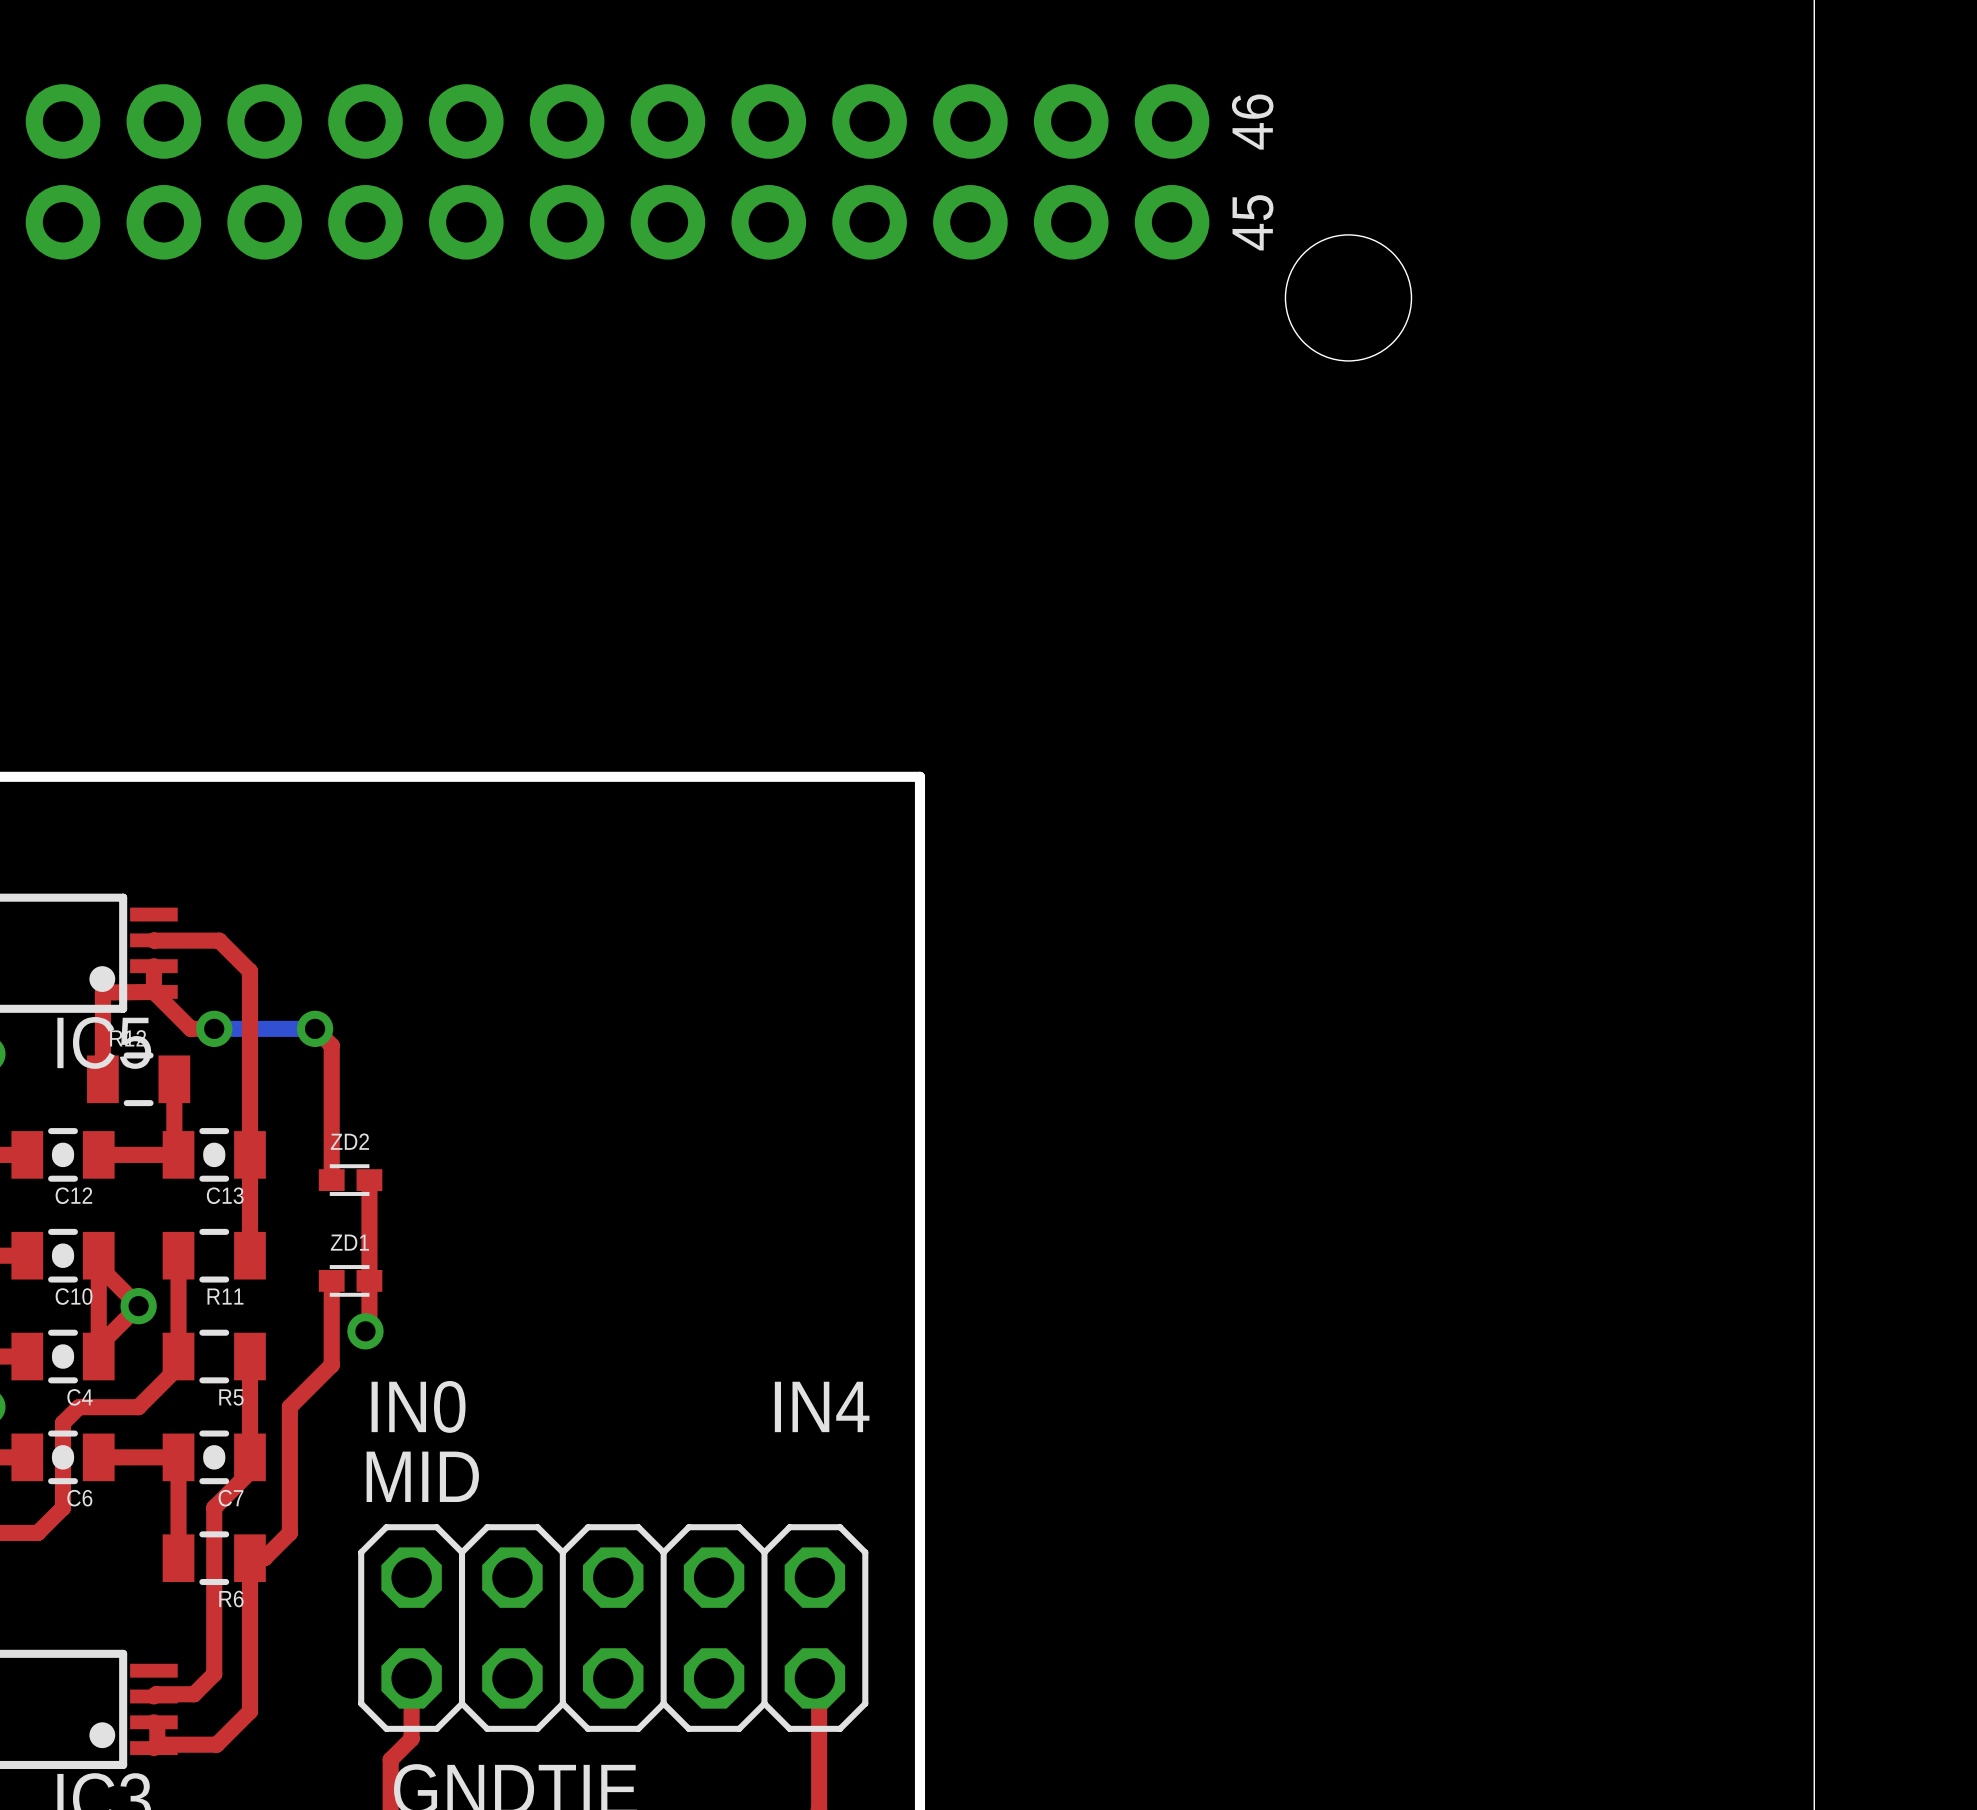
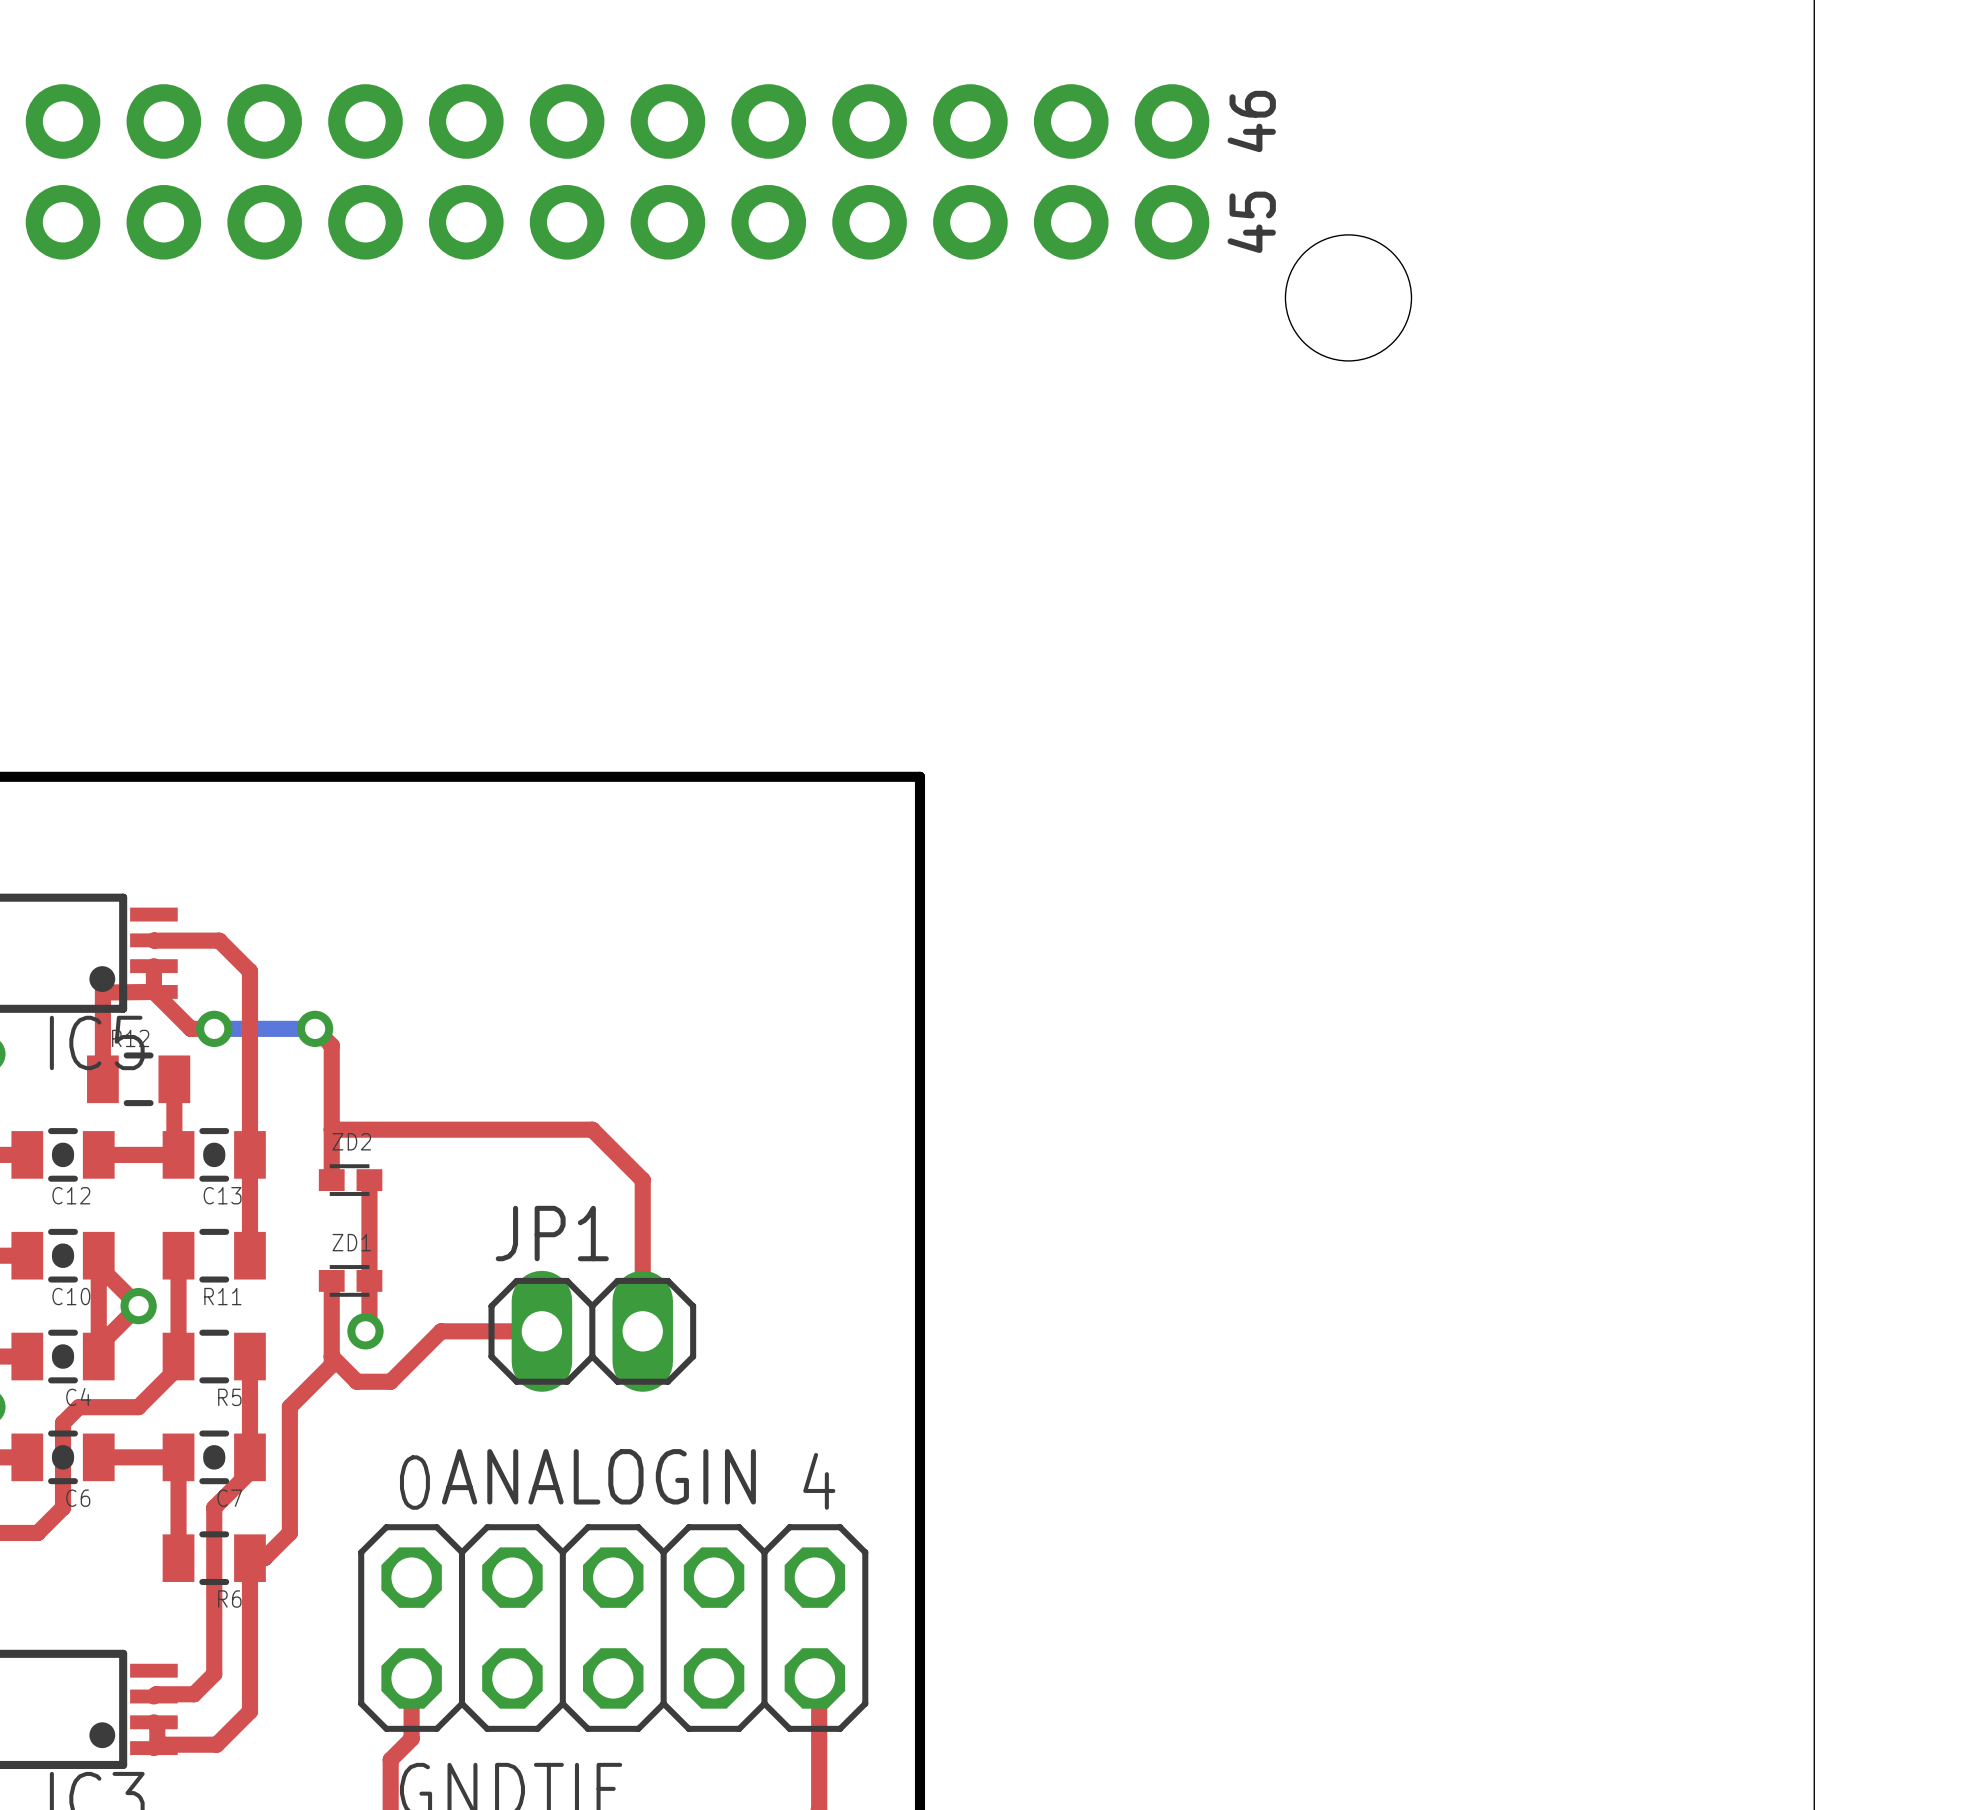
top track: none -> (331, 1129) (592, 1129) (642, 1180) (642, 1331)
top track: none -> (541, 1331) (441, 1331) (390, 1381) (356, 1381) (331, 1356)
JP1: none -> (592, 1331)
text: IN0 (418, 1406) -> none
text: IN4 (822, 1406) -> none
MID name: MID (422, 1476) -> ANALOGIN (598, 1476)
text: none -> 0 (414, 1482)
text: none -> 4 (819, 1481)

